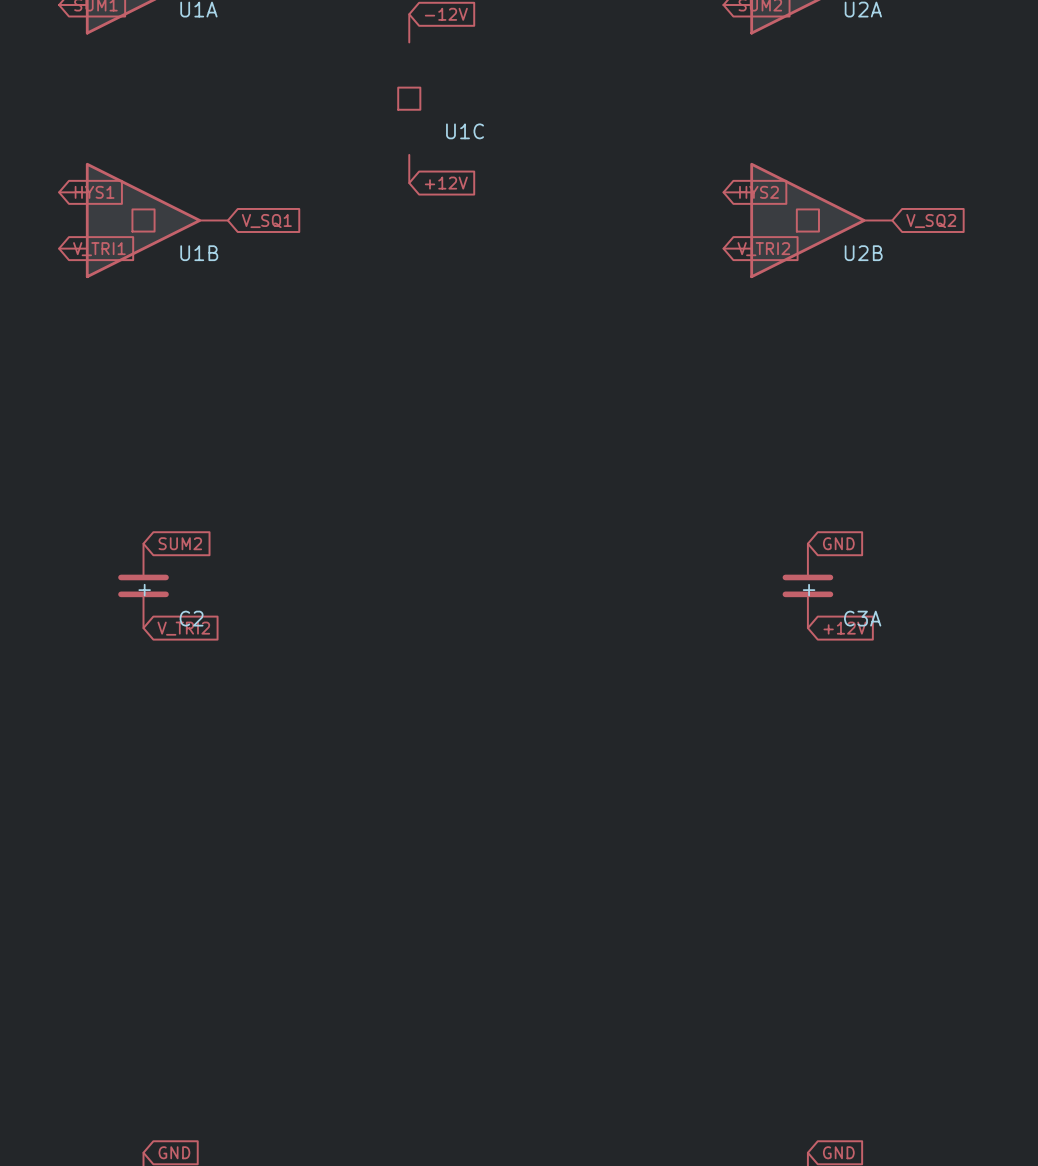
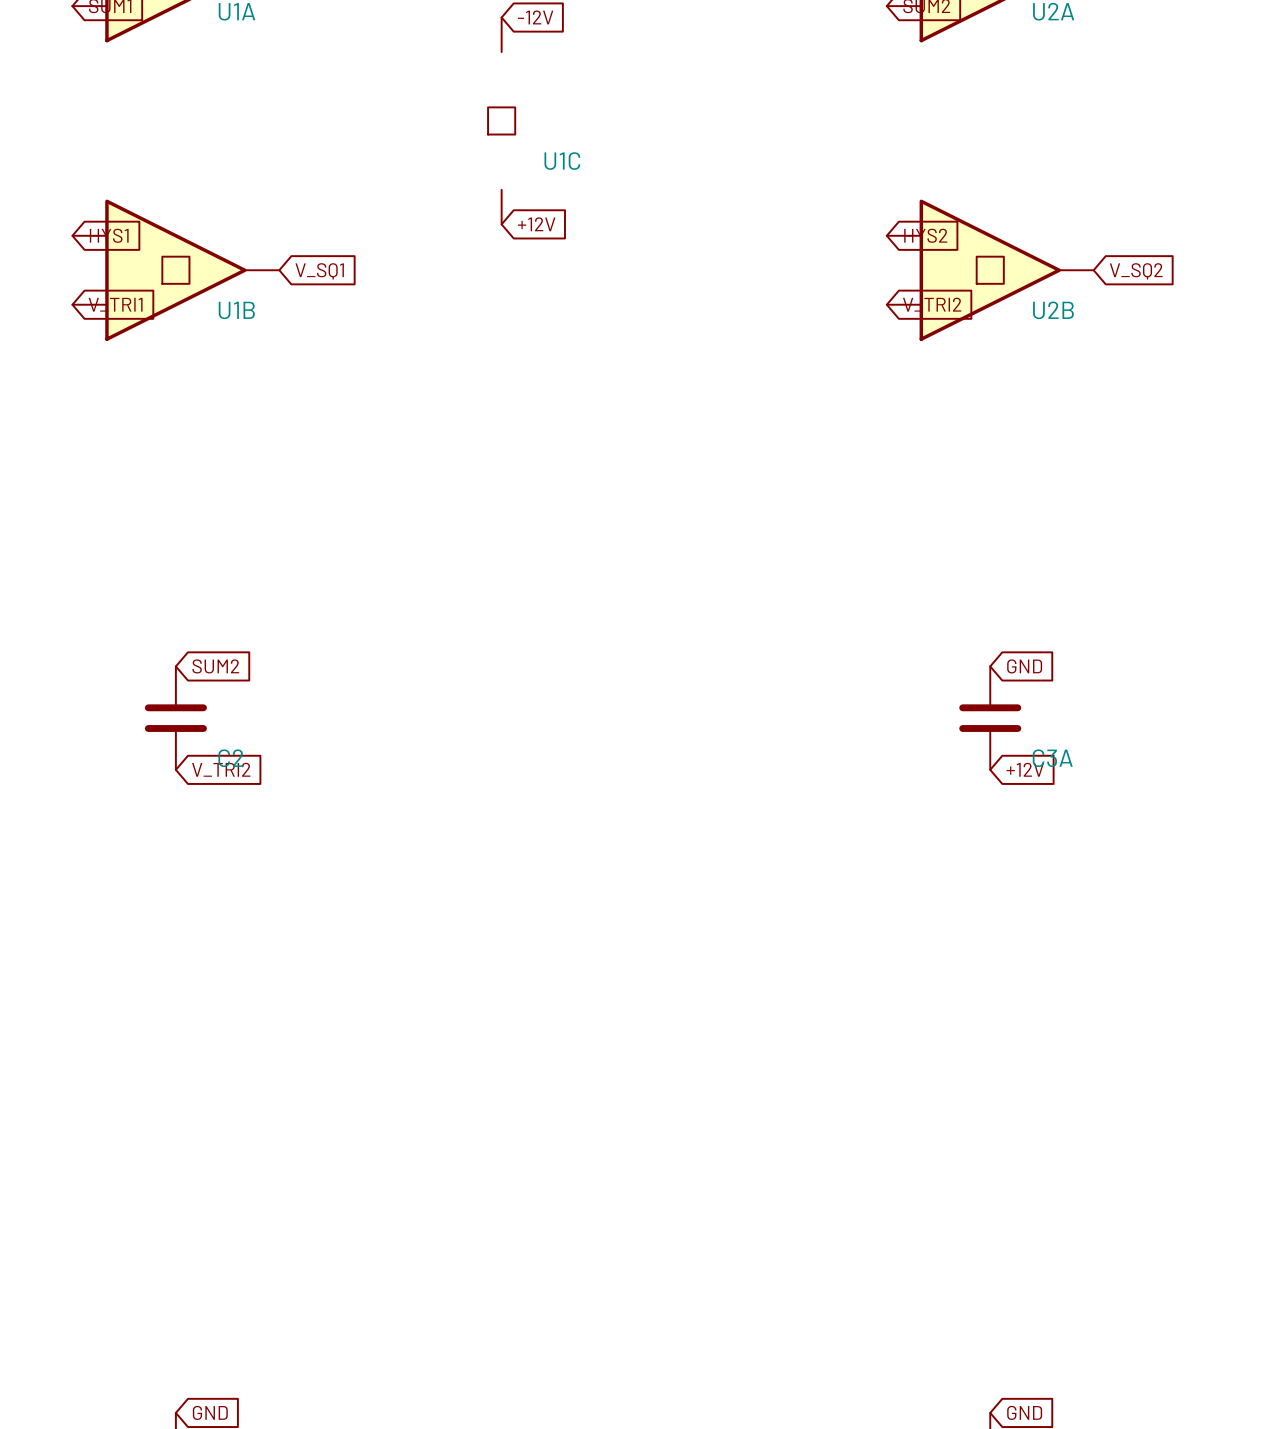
C2 pin name: + (144, 590) -> none
C3A pin name: + (809, 590) -> none

